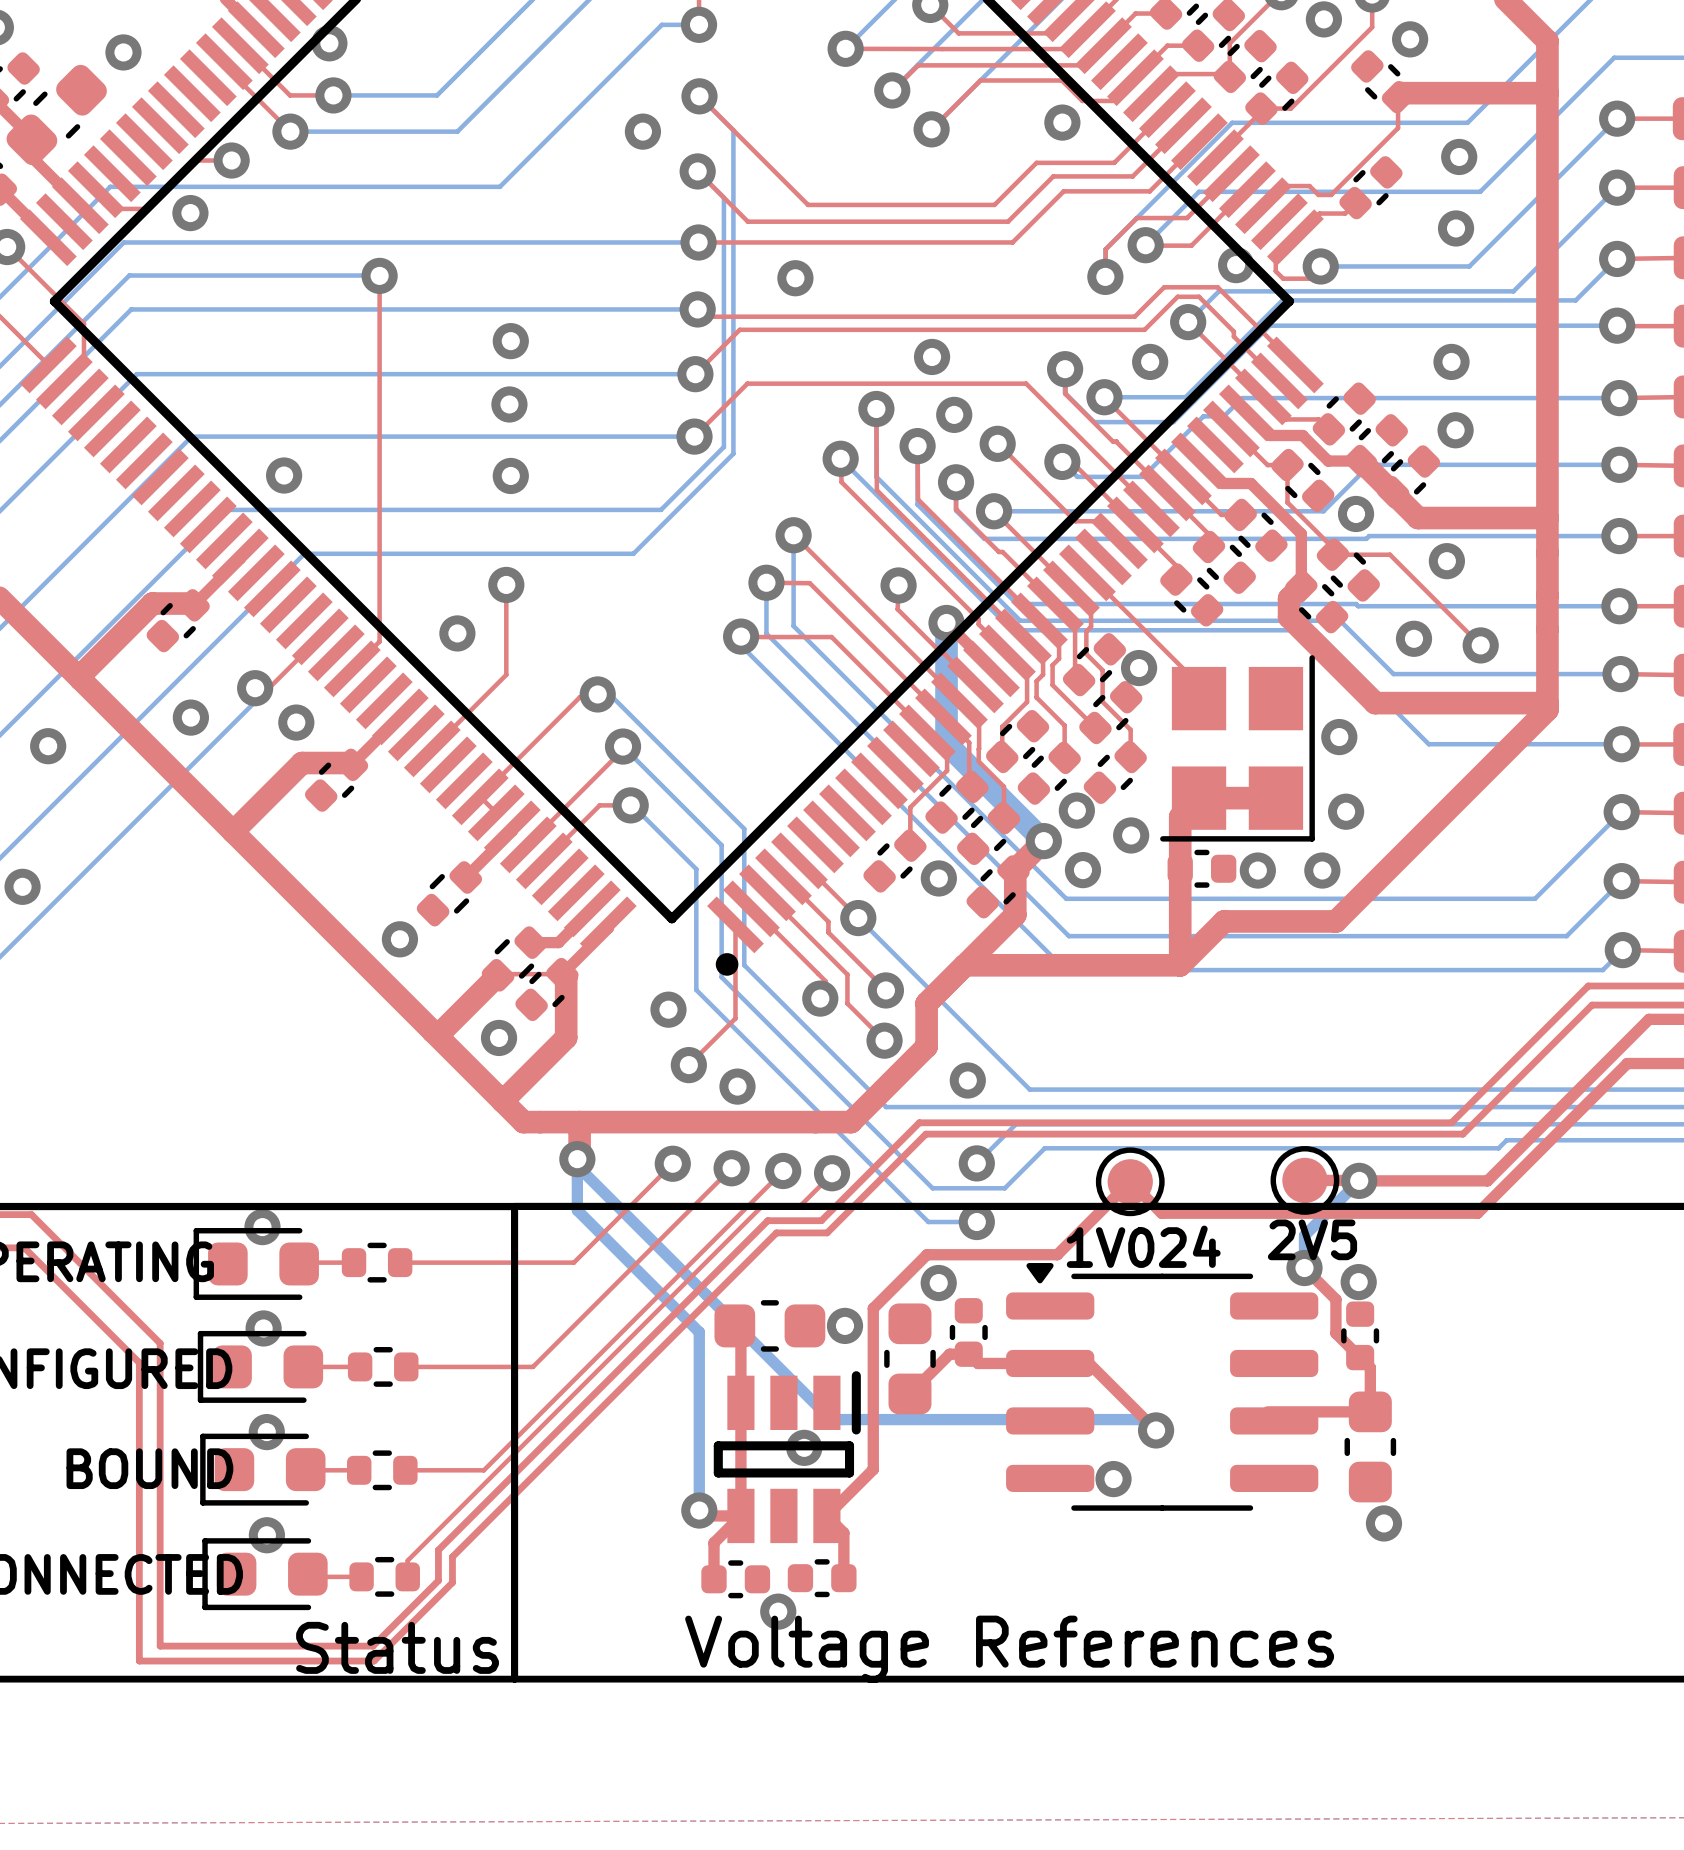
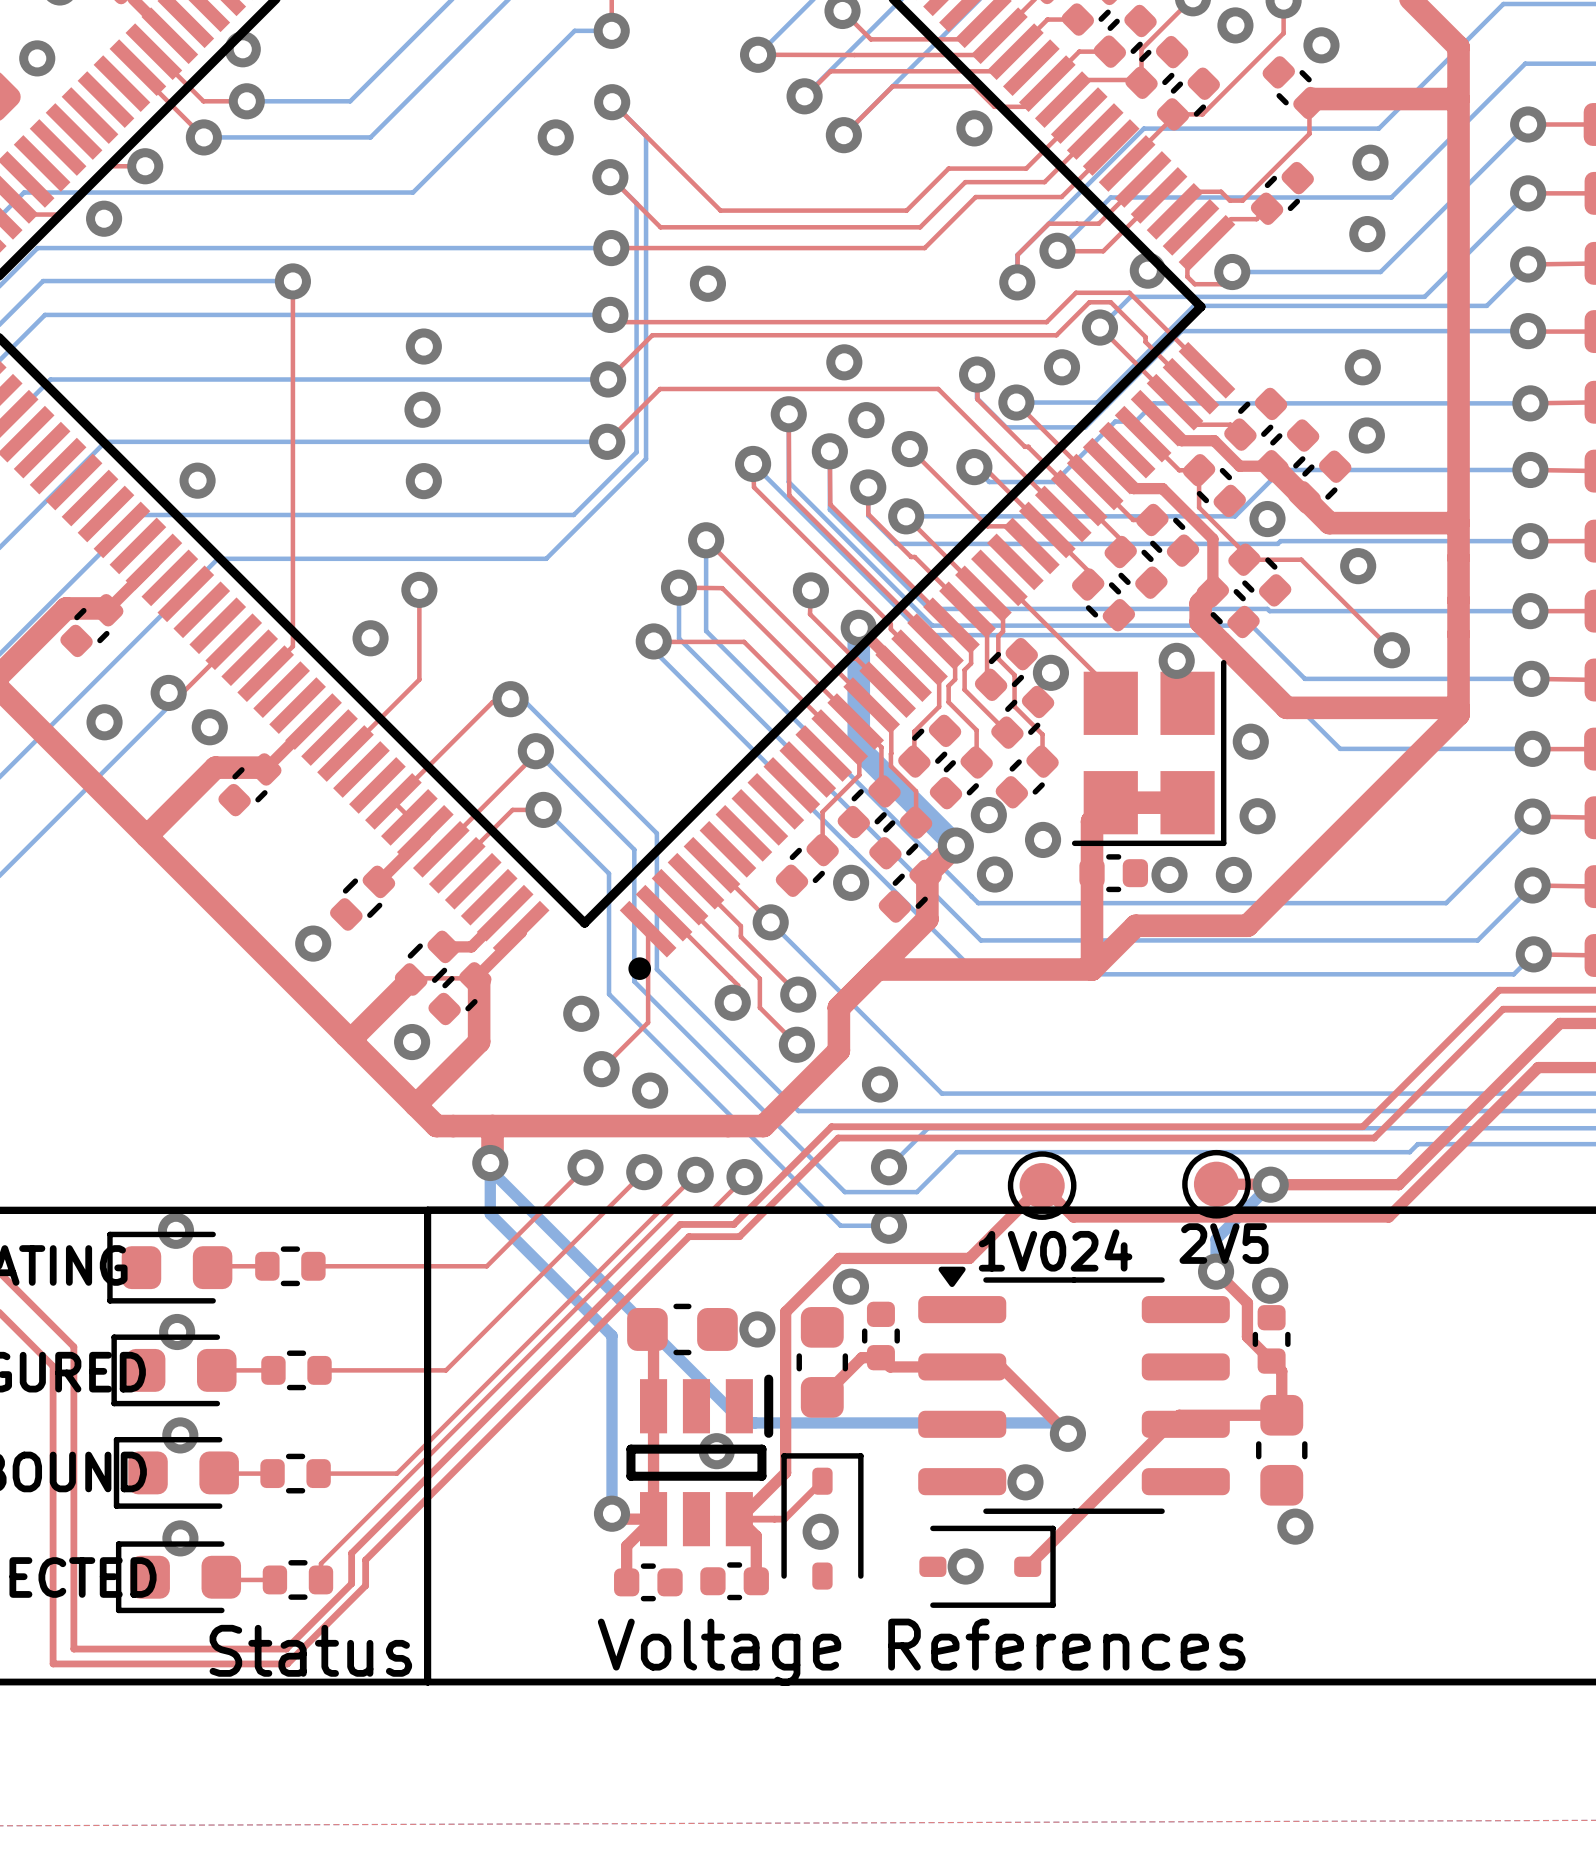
via position: (1414, 638) -> (1176, 660)
top track: none -> (1179, 1415) (1027, 1566)
top track: none -> (822, 1481) (784, 1519) (739, 1519)
part: none -> (822, 1521)
via: none -> (820, 1531)
via: none -> (965, 1566)
part: none -> (987, 1566)
via: (778, 1611) -> none

